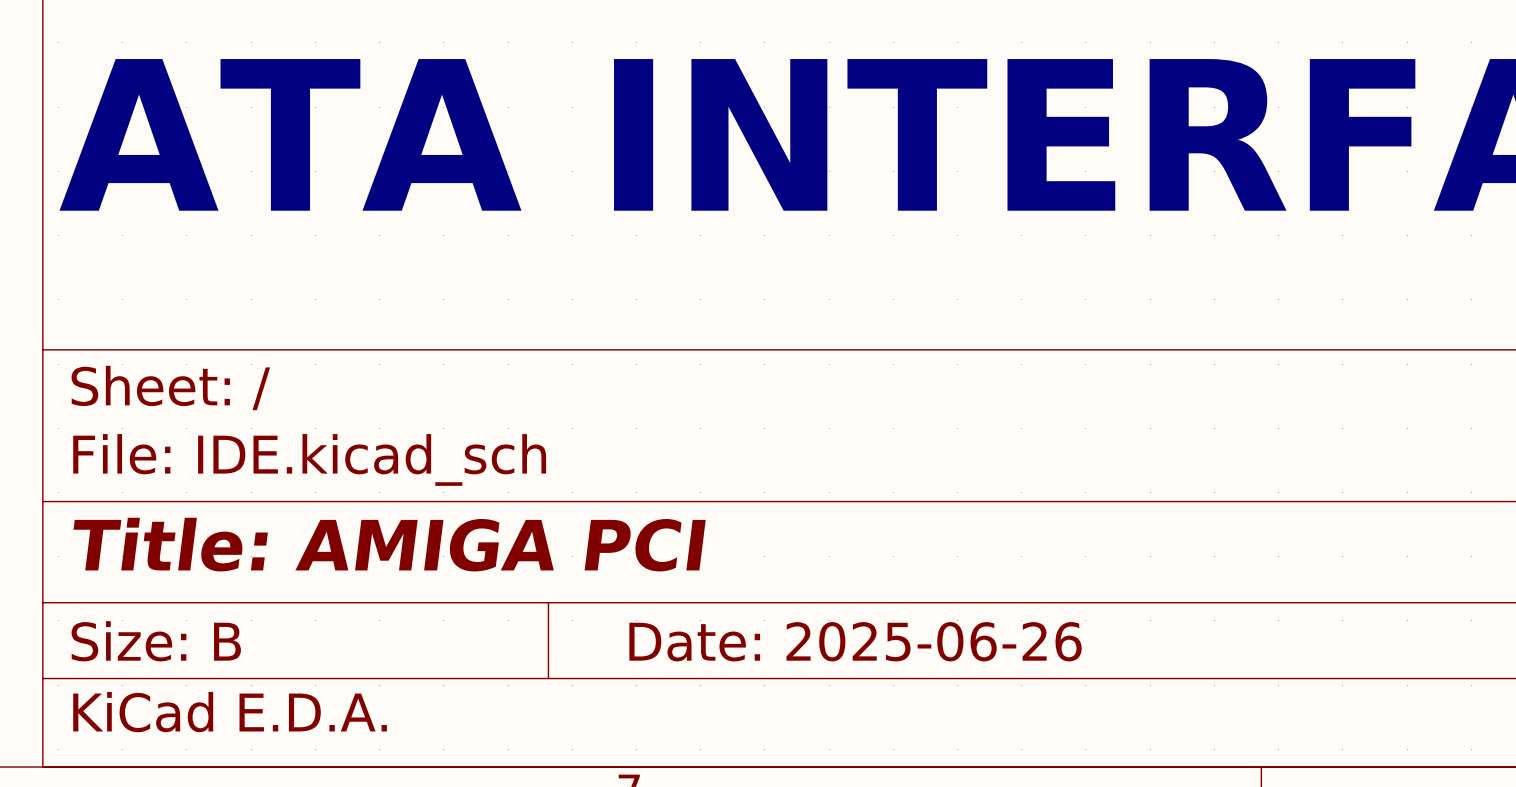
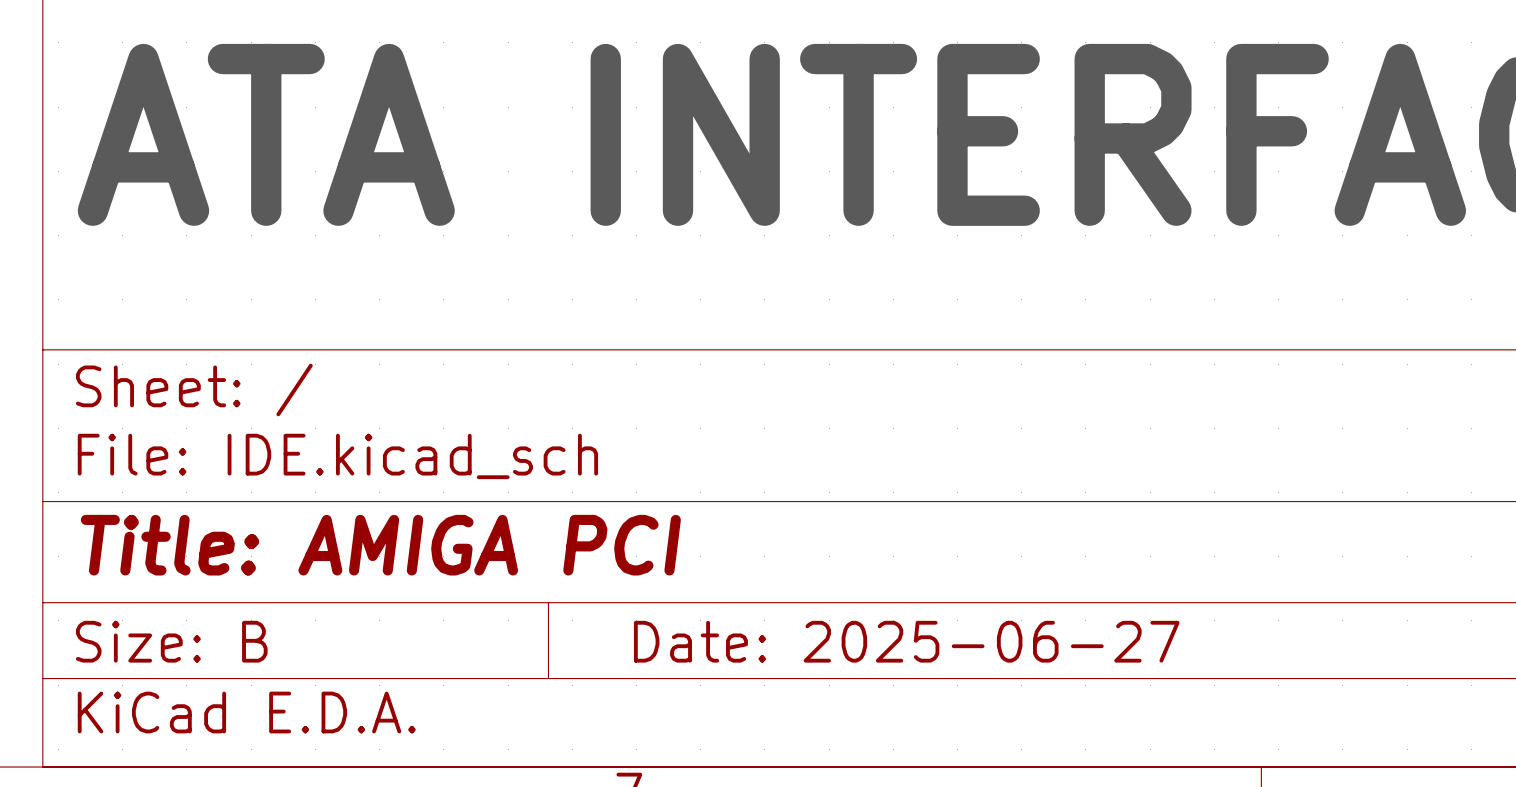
title block: Date: 2025-06-26 (855, 641) -> Date: 2025-06-27 (906, 641)

